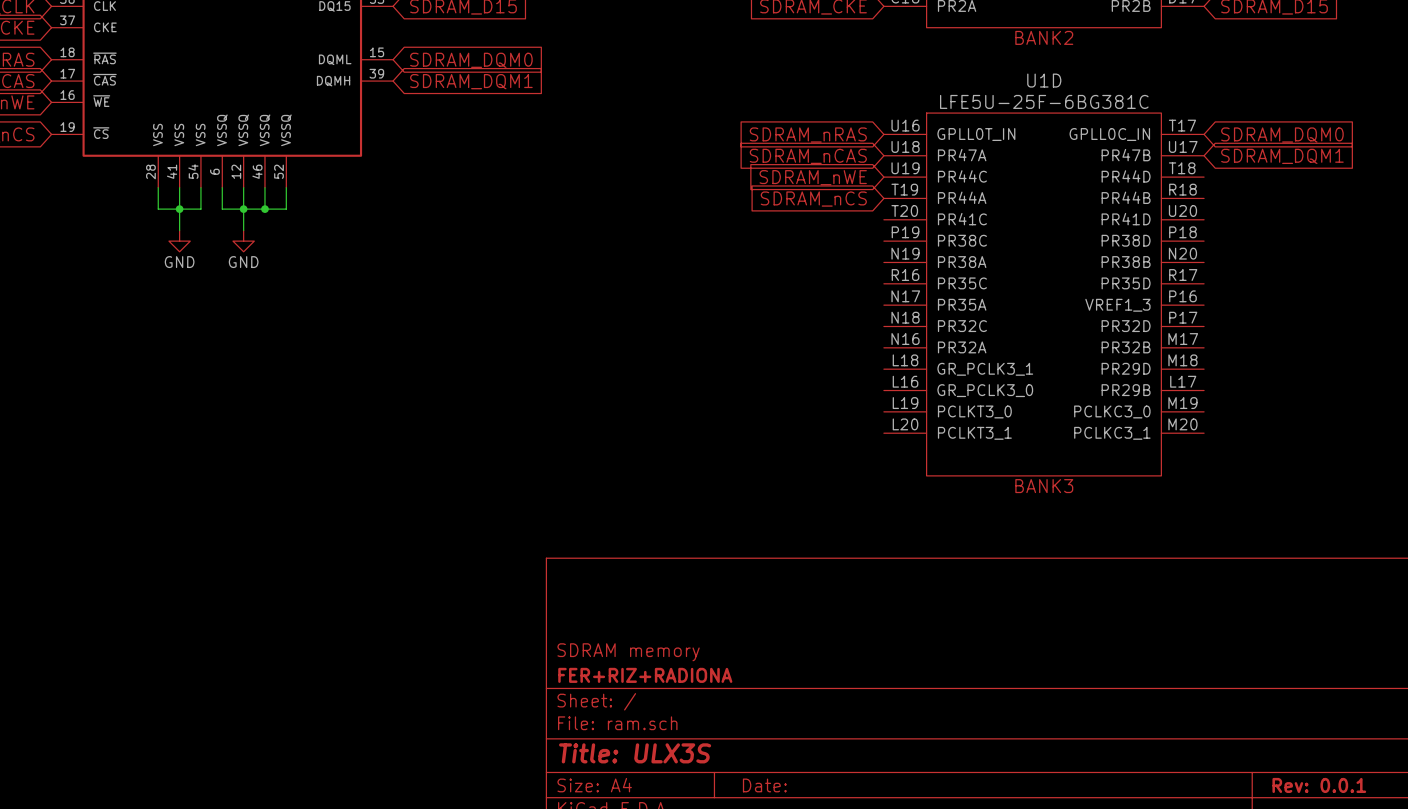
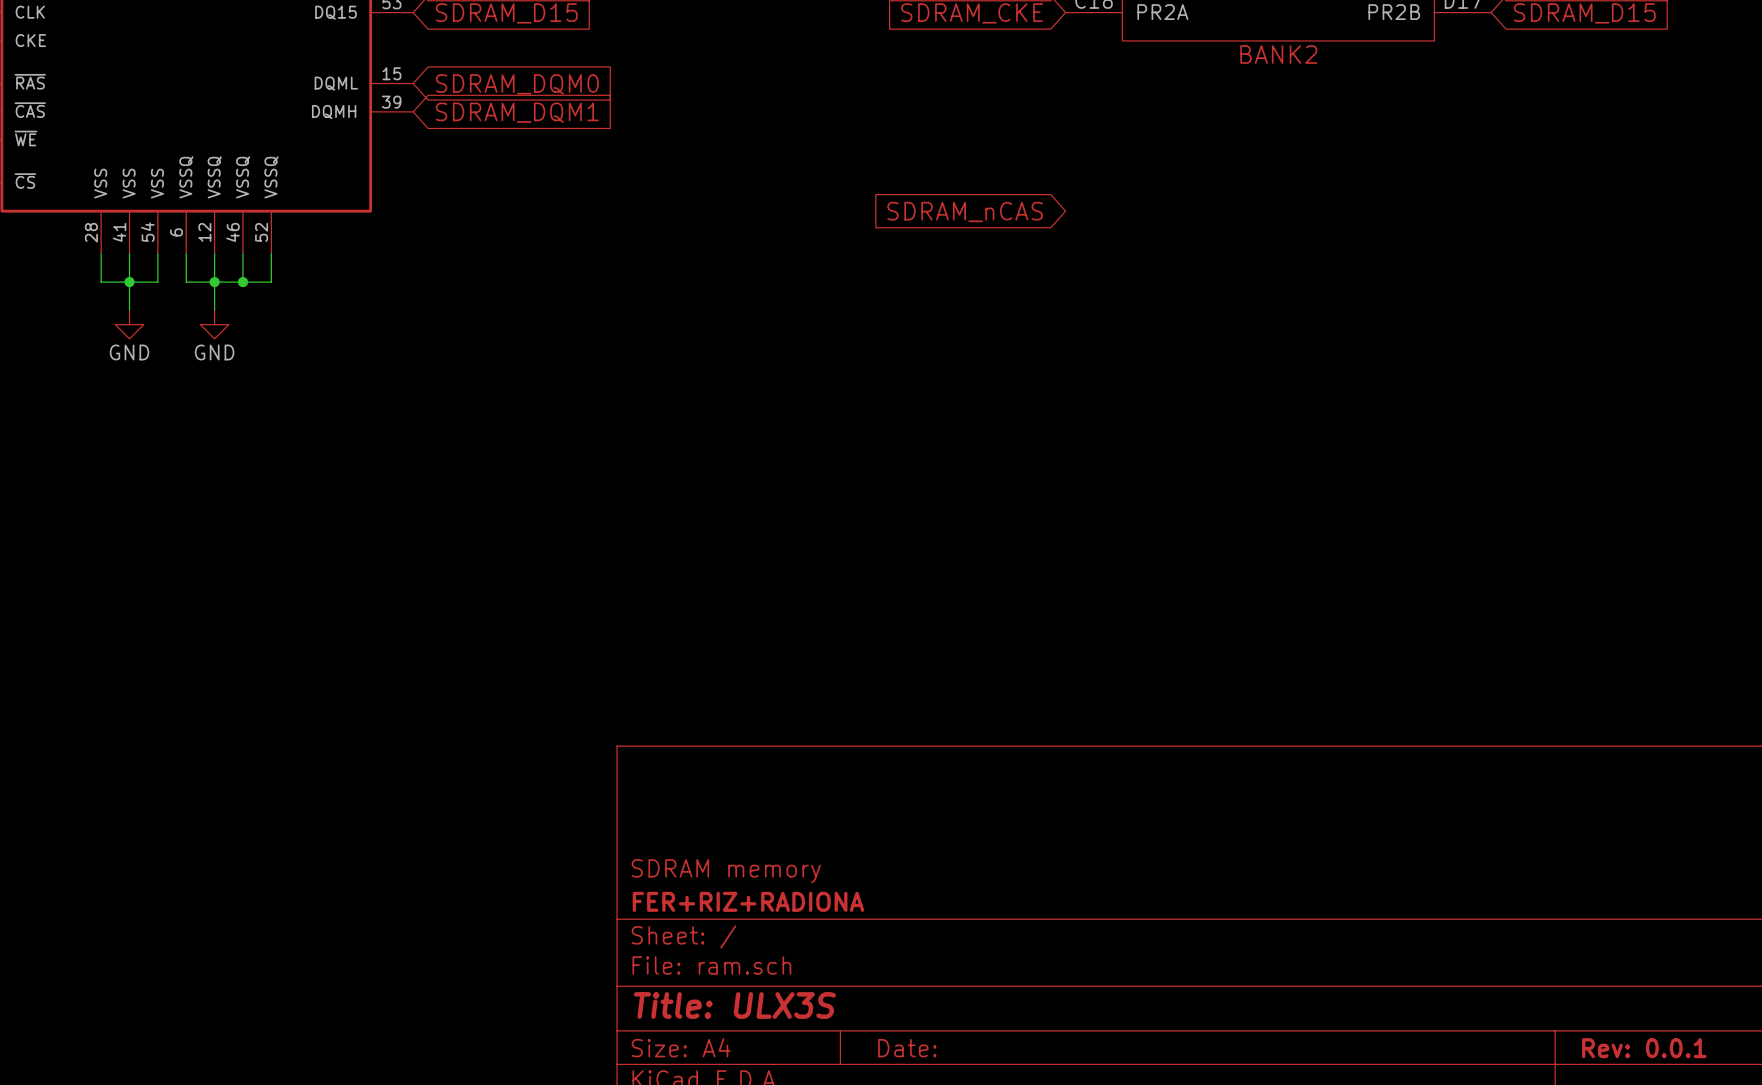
global label: SDRAM_nRAS (808, 135) -> none
global label: SDRAM_DQM0 (1282, 135) -> none
global label: SDRAM_DQM1 (1282, 156) -> none
global label: SDRAM_nWE (813, 177) -> none
global label: SDRAM_nCS (813, 199) -> none
U1D: LFE5U-25F-6BG381C (1043, 294) -> none

